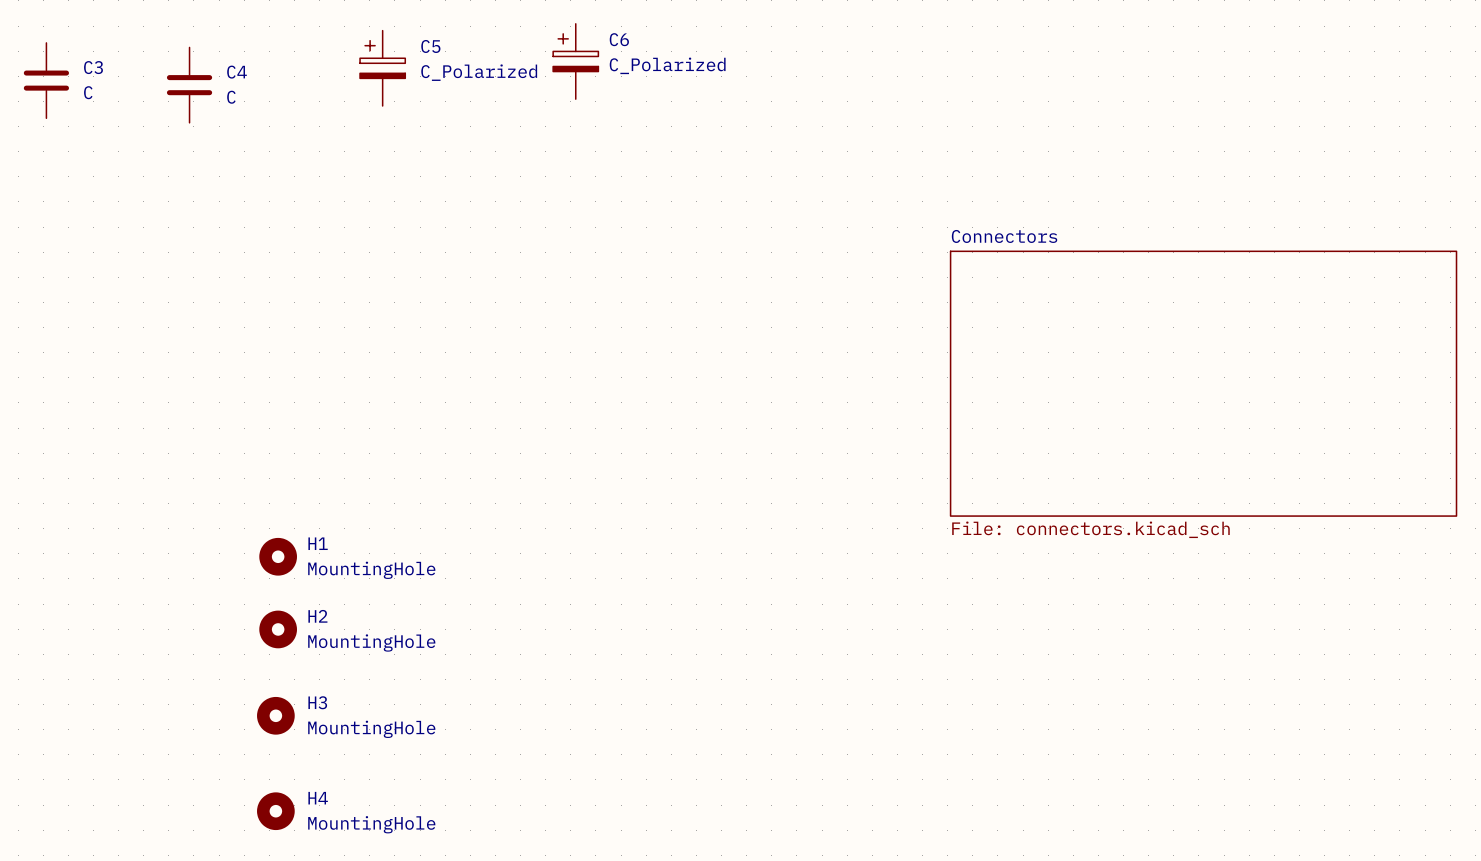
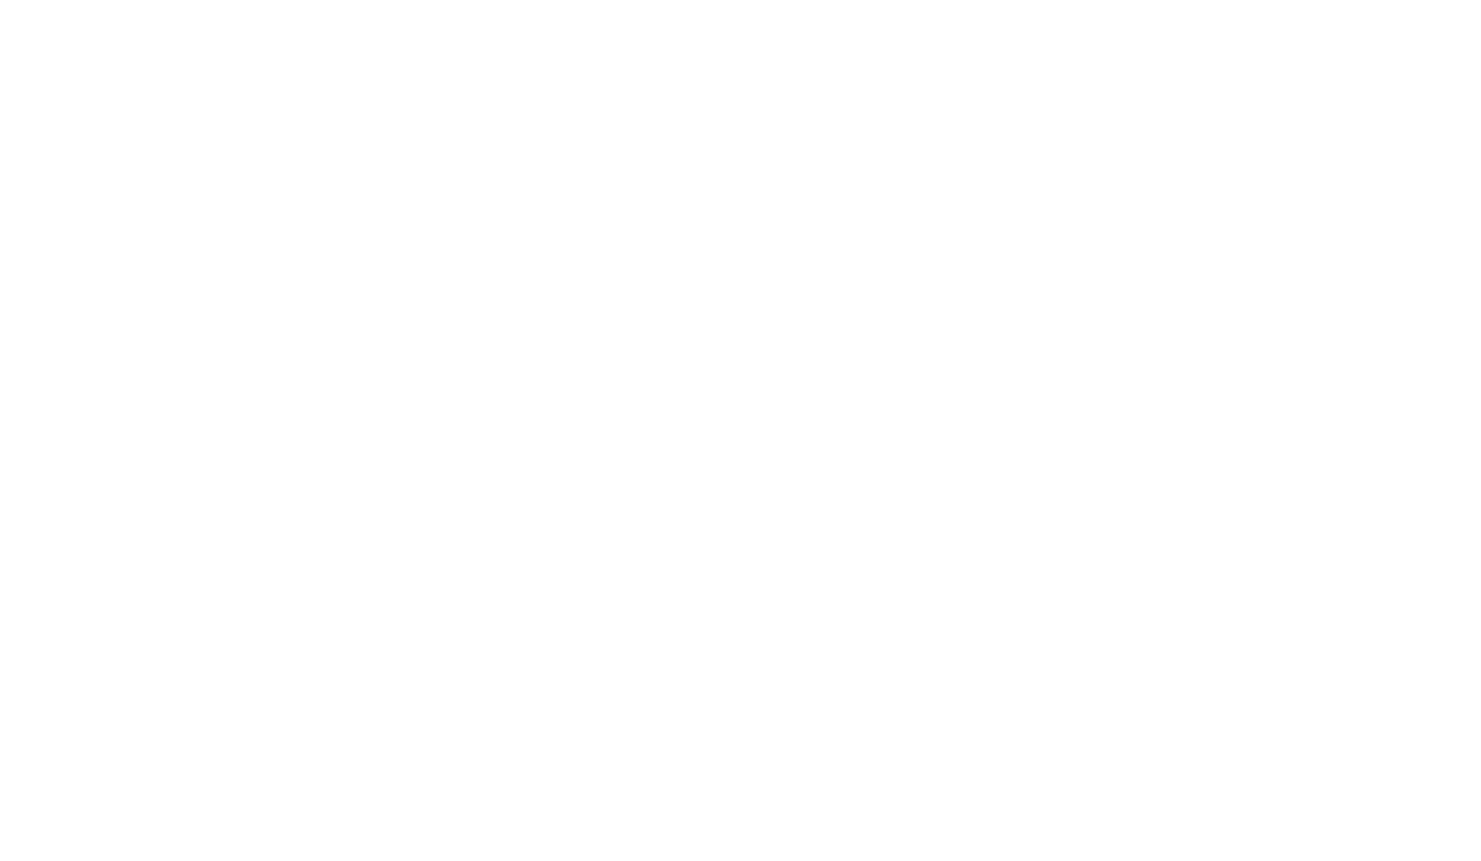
C6: C_Polarized (575, 61) -> none
C5: C_Polarized (382, 68) -> none
C3: C (46, 80) -> none
C4: C (189, 85) -> none
sheet Connectors: File: connectors.kicad_sch (1203, 383) -> none
H1: MountingHole (278, 556) -> none
H2: MountingHole (278, 629) -> none
H3: MountingHole (275, 715) -> none
H4: MountingHole (275, 811) -> none

